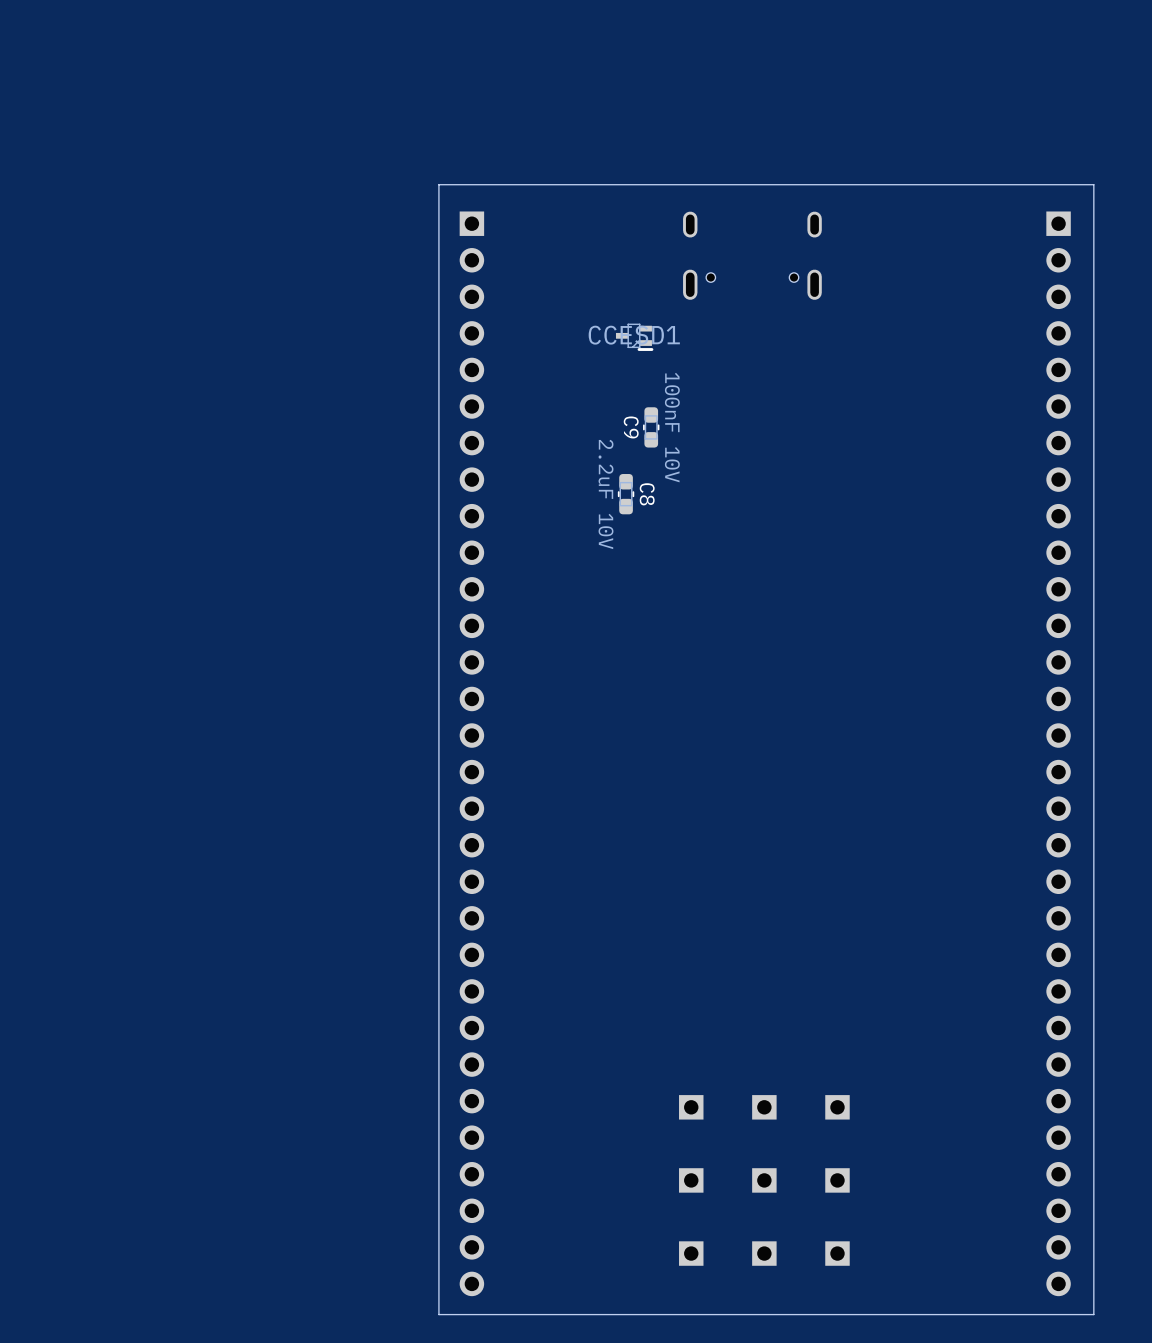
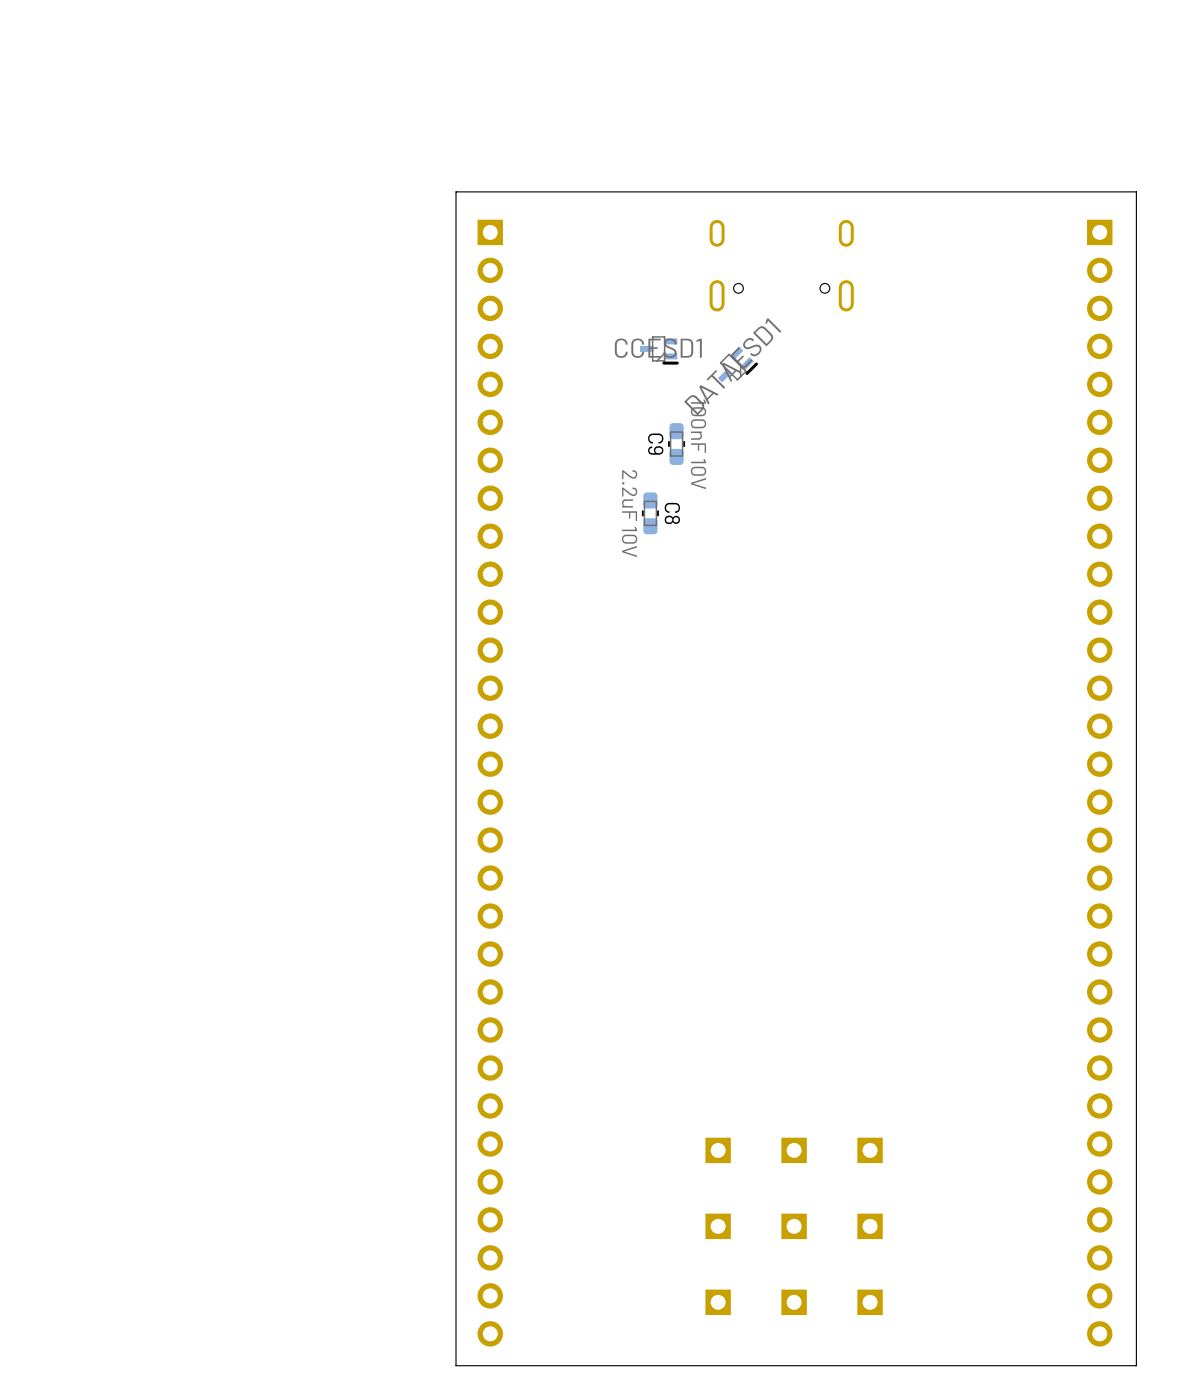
DATAESD1: none -> (737, 364)

